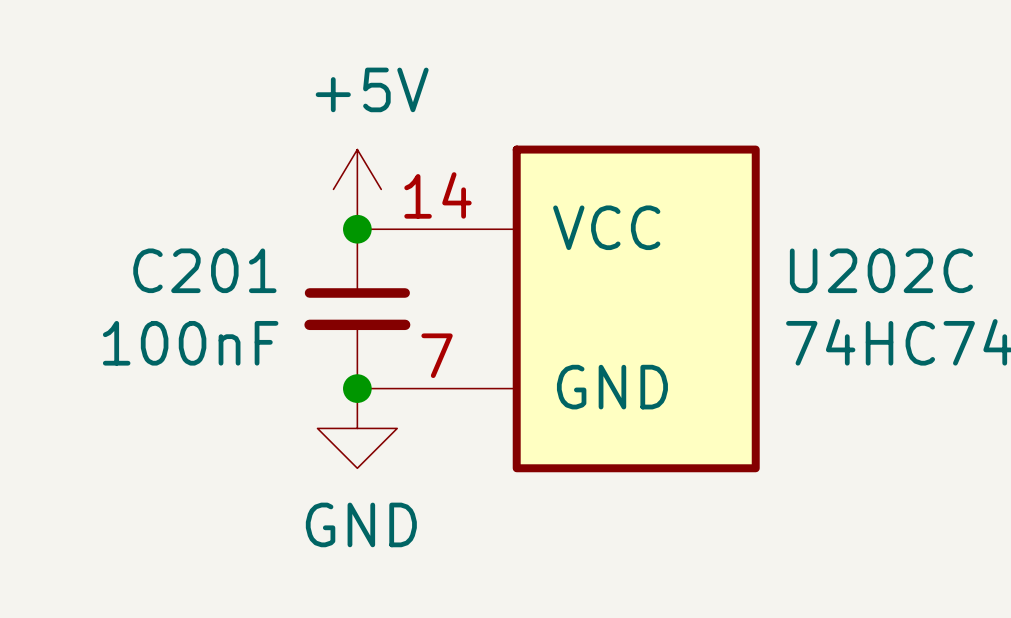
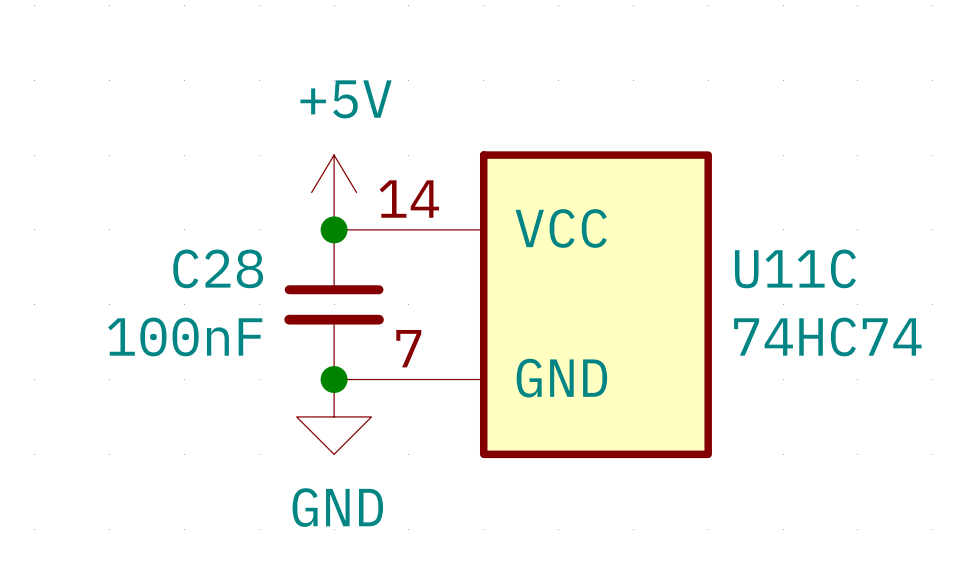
C201 name: C201 (204, 270) -> C28 (218, 268)
U202C name: U202C (881, 270) -> U11C (795, 268)

